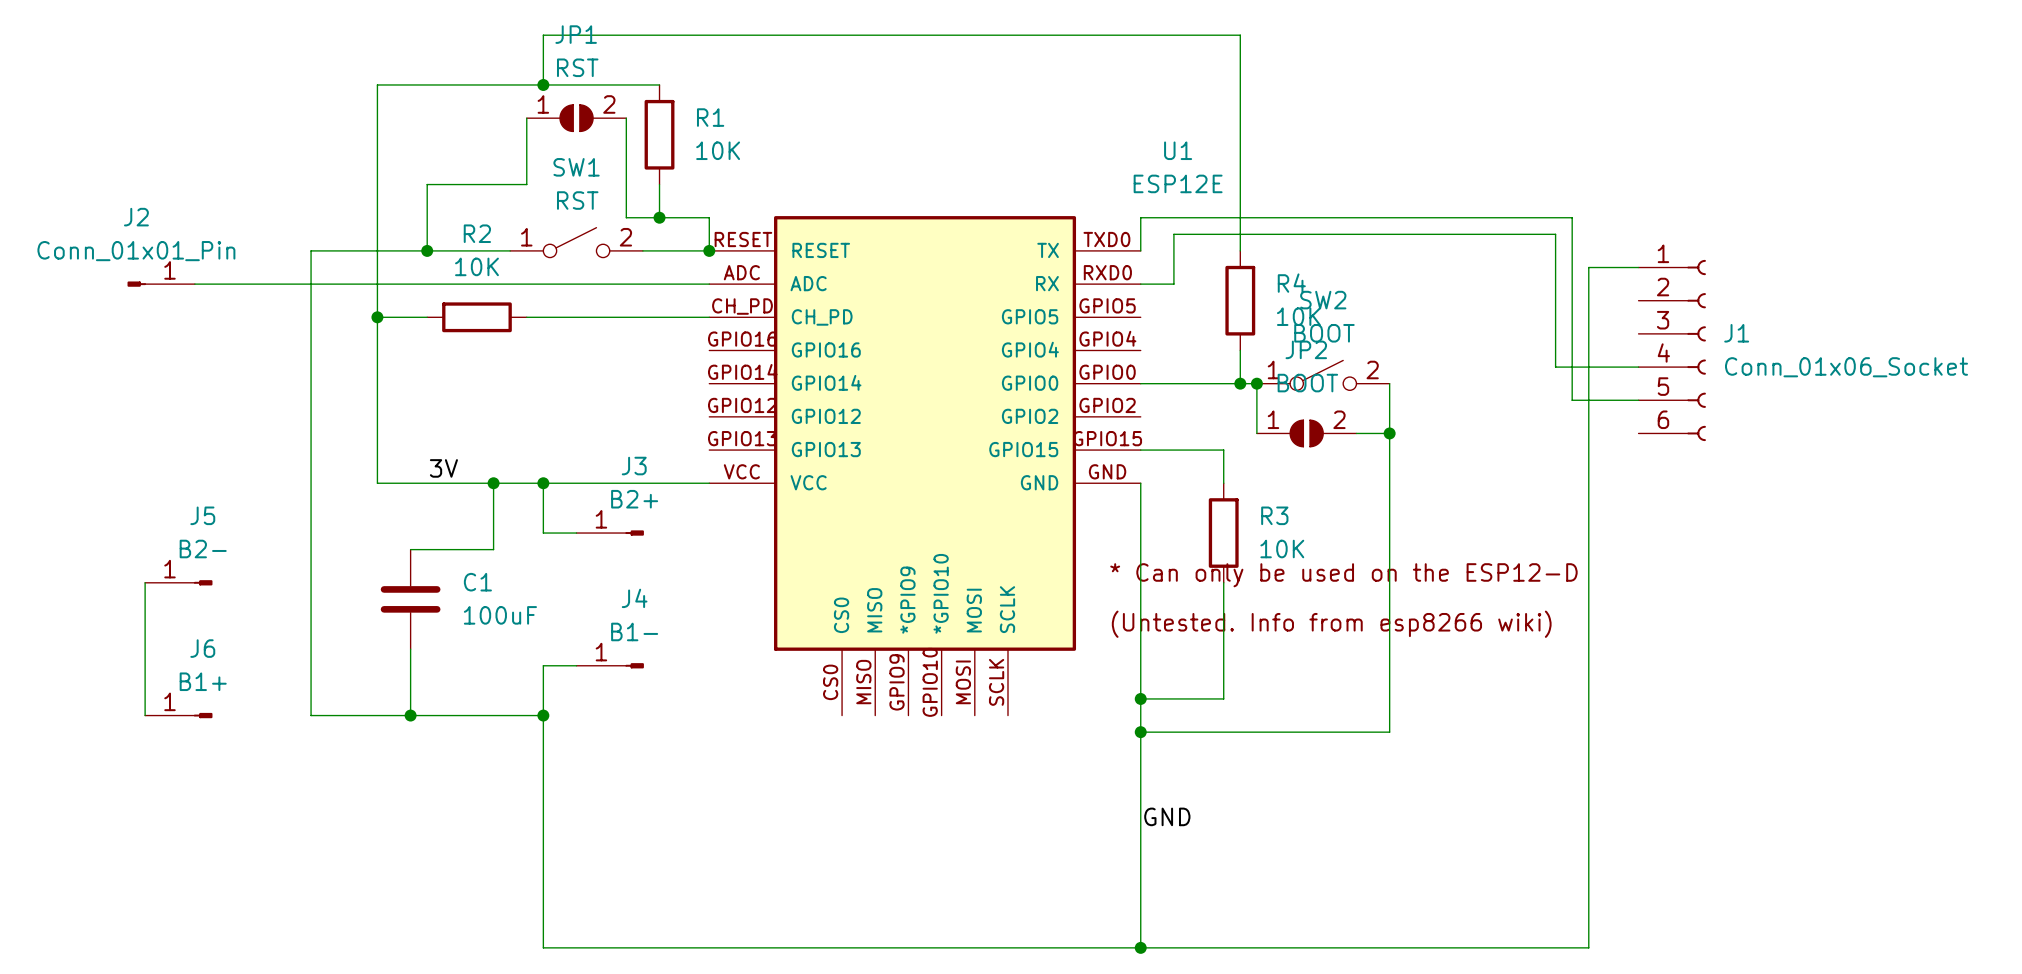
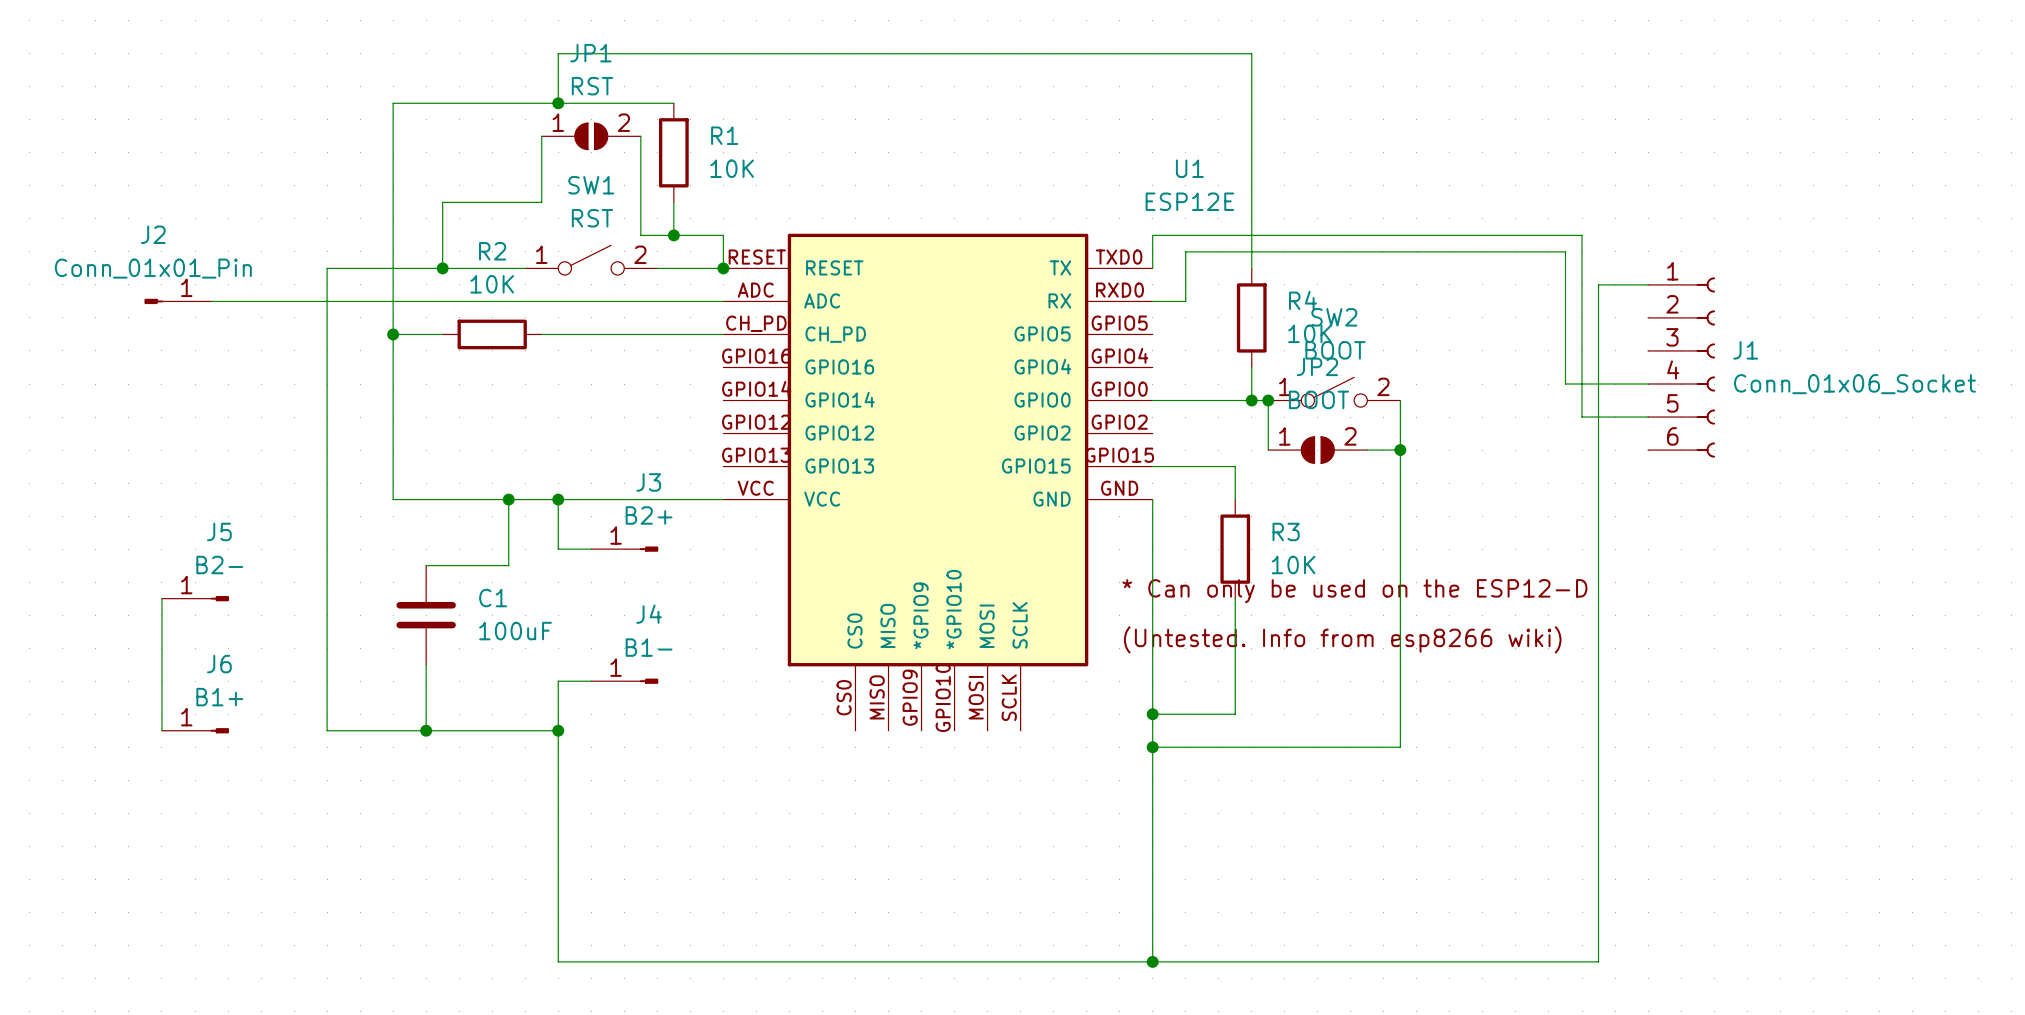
label: 3V (443, 468) -> none
label: GND (1167, 816) -> none

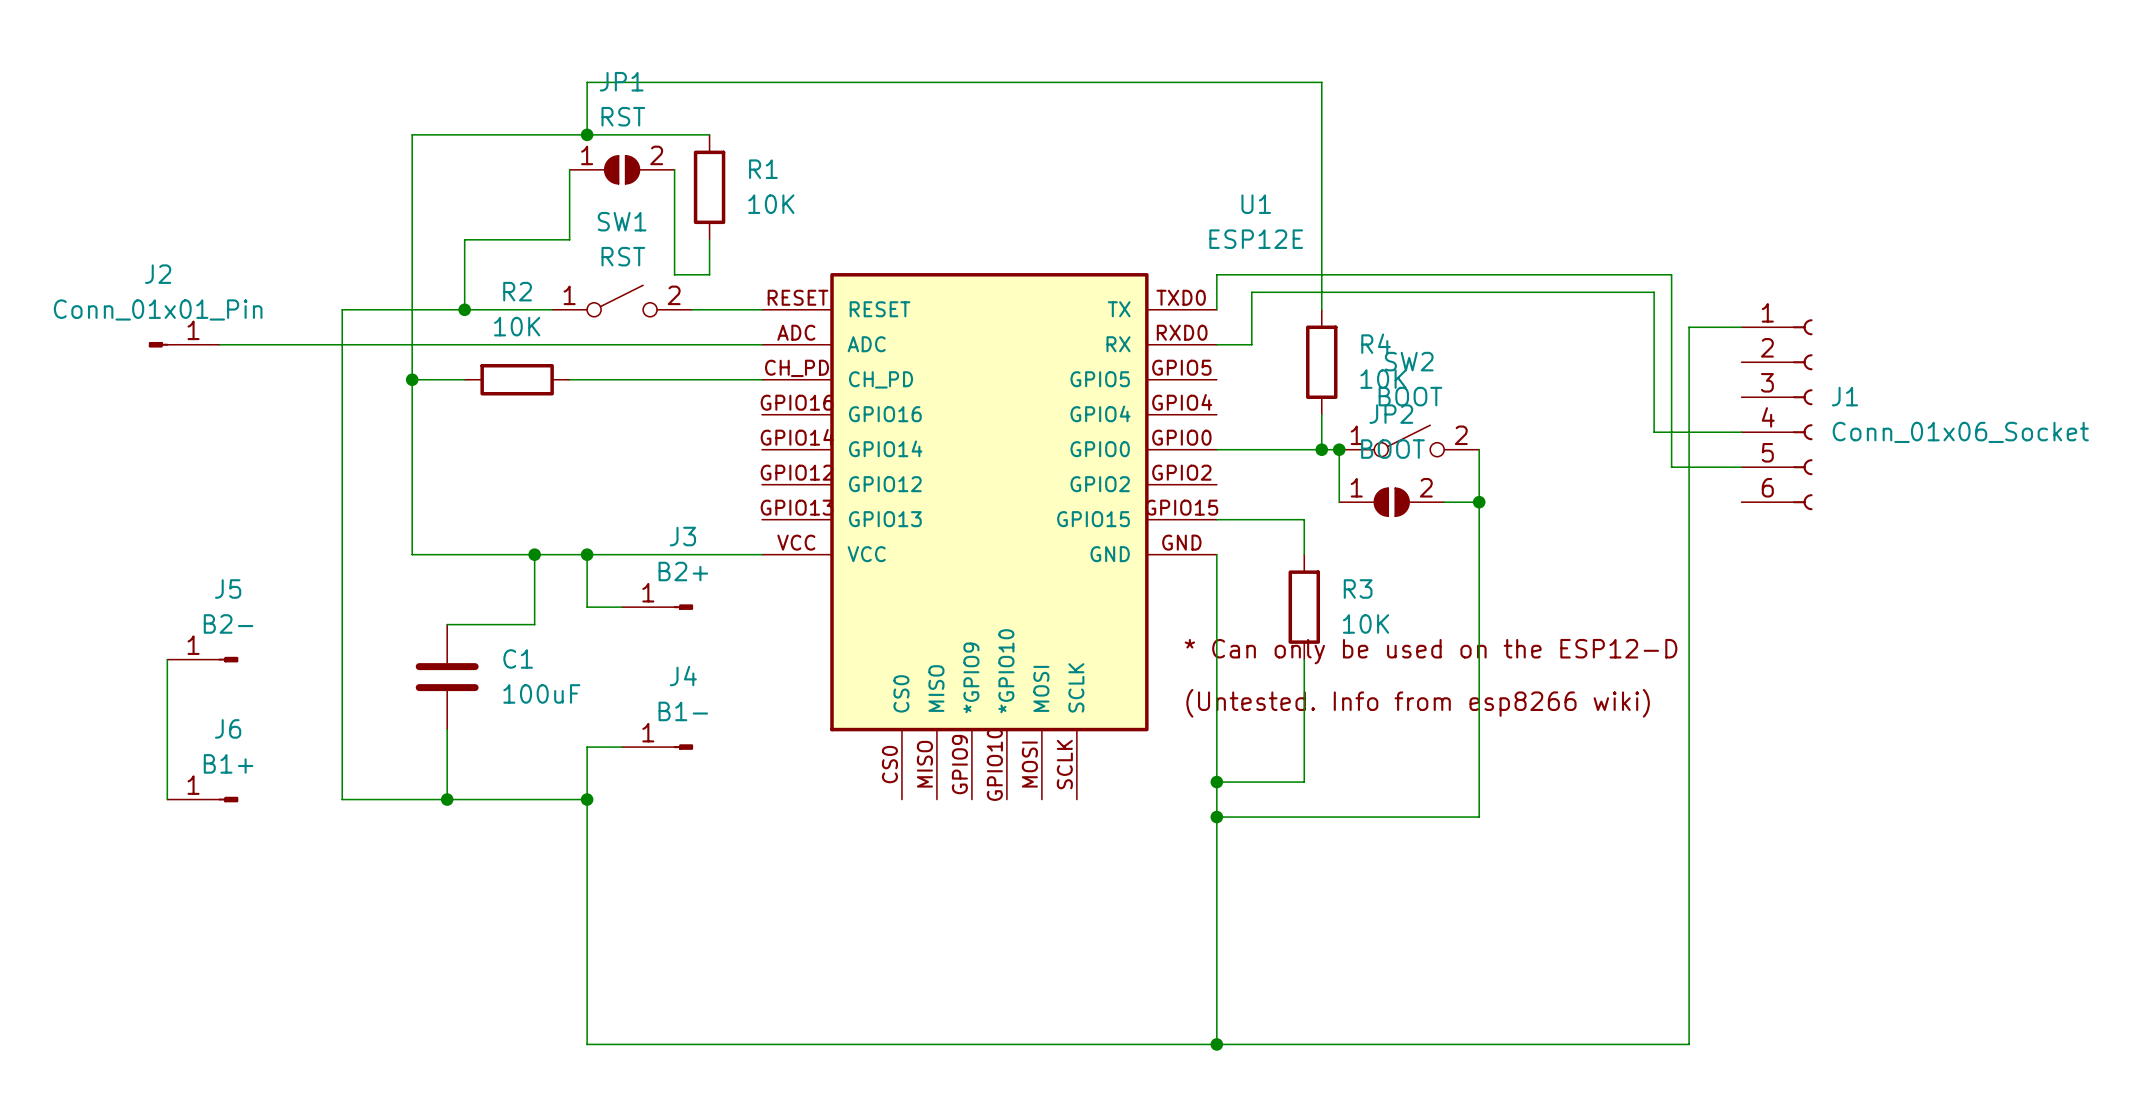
wire: (673, 235) (723, 235) (723, 268) -> none
junction: (673, 235) -> none
junction: (723, 268) -> none

